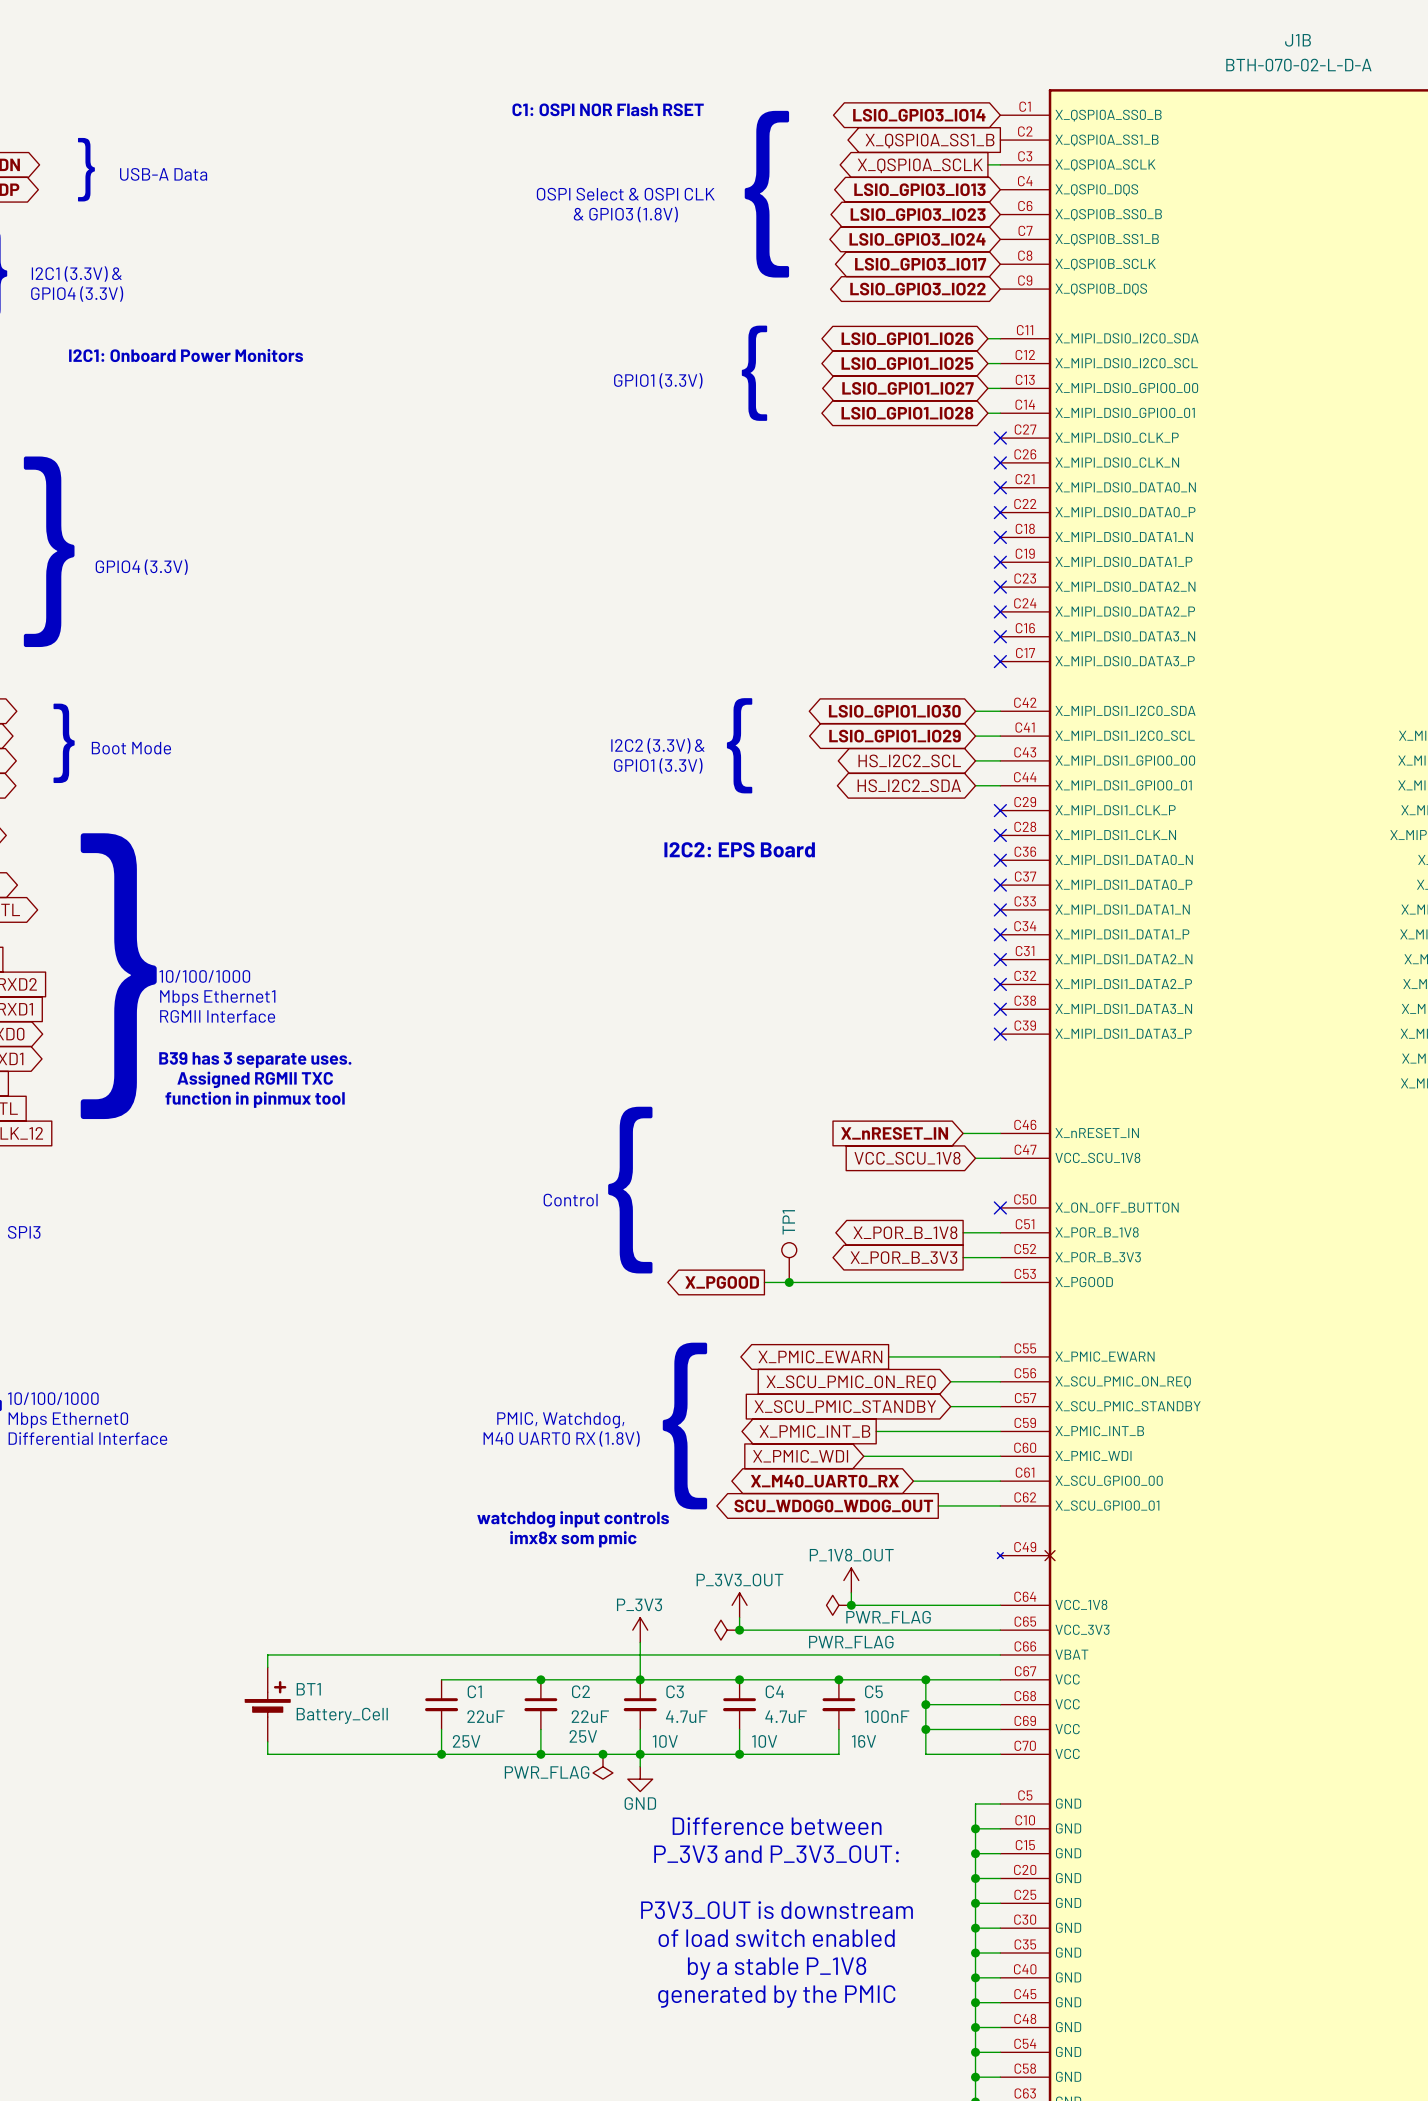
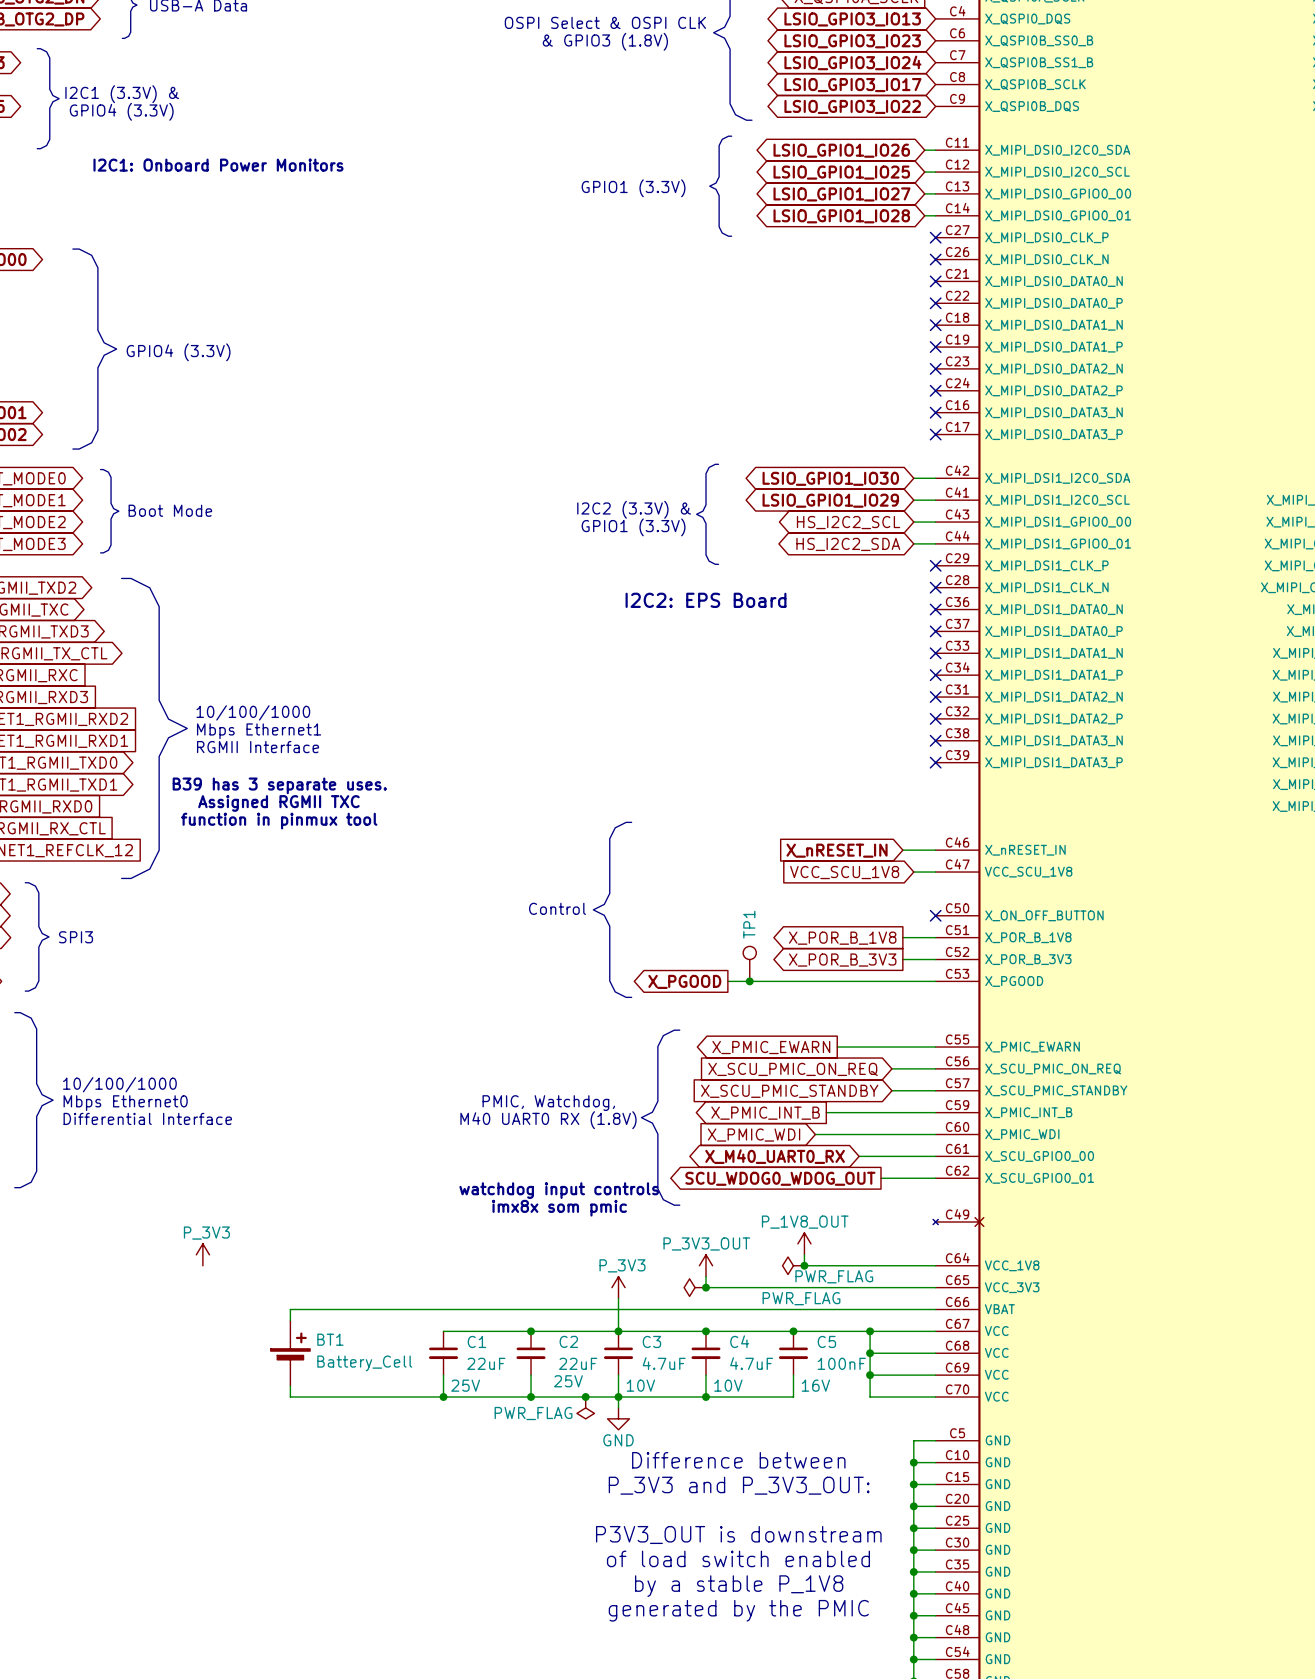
power symbol: none -> P_3V3 (202, 1254)

